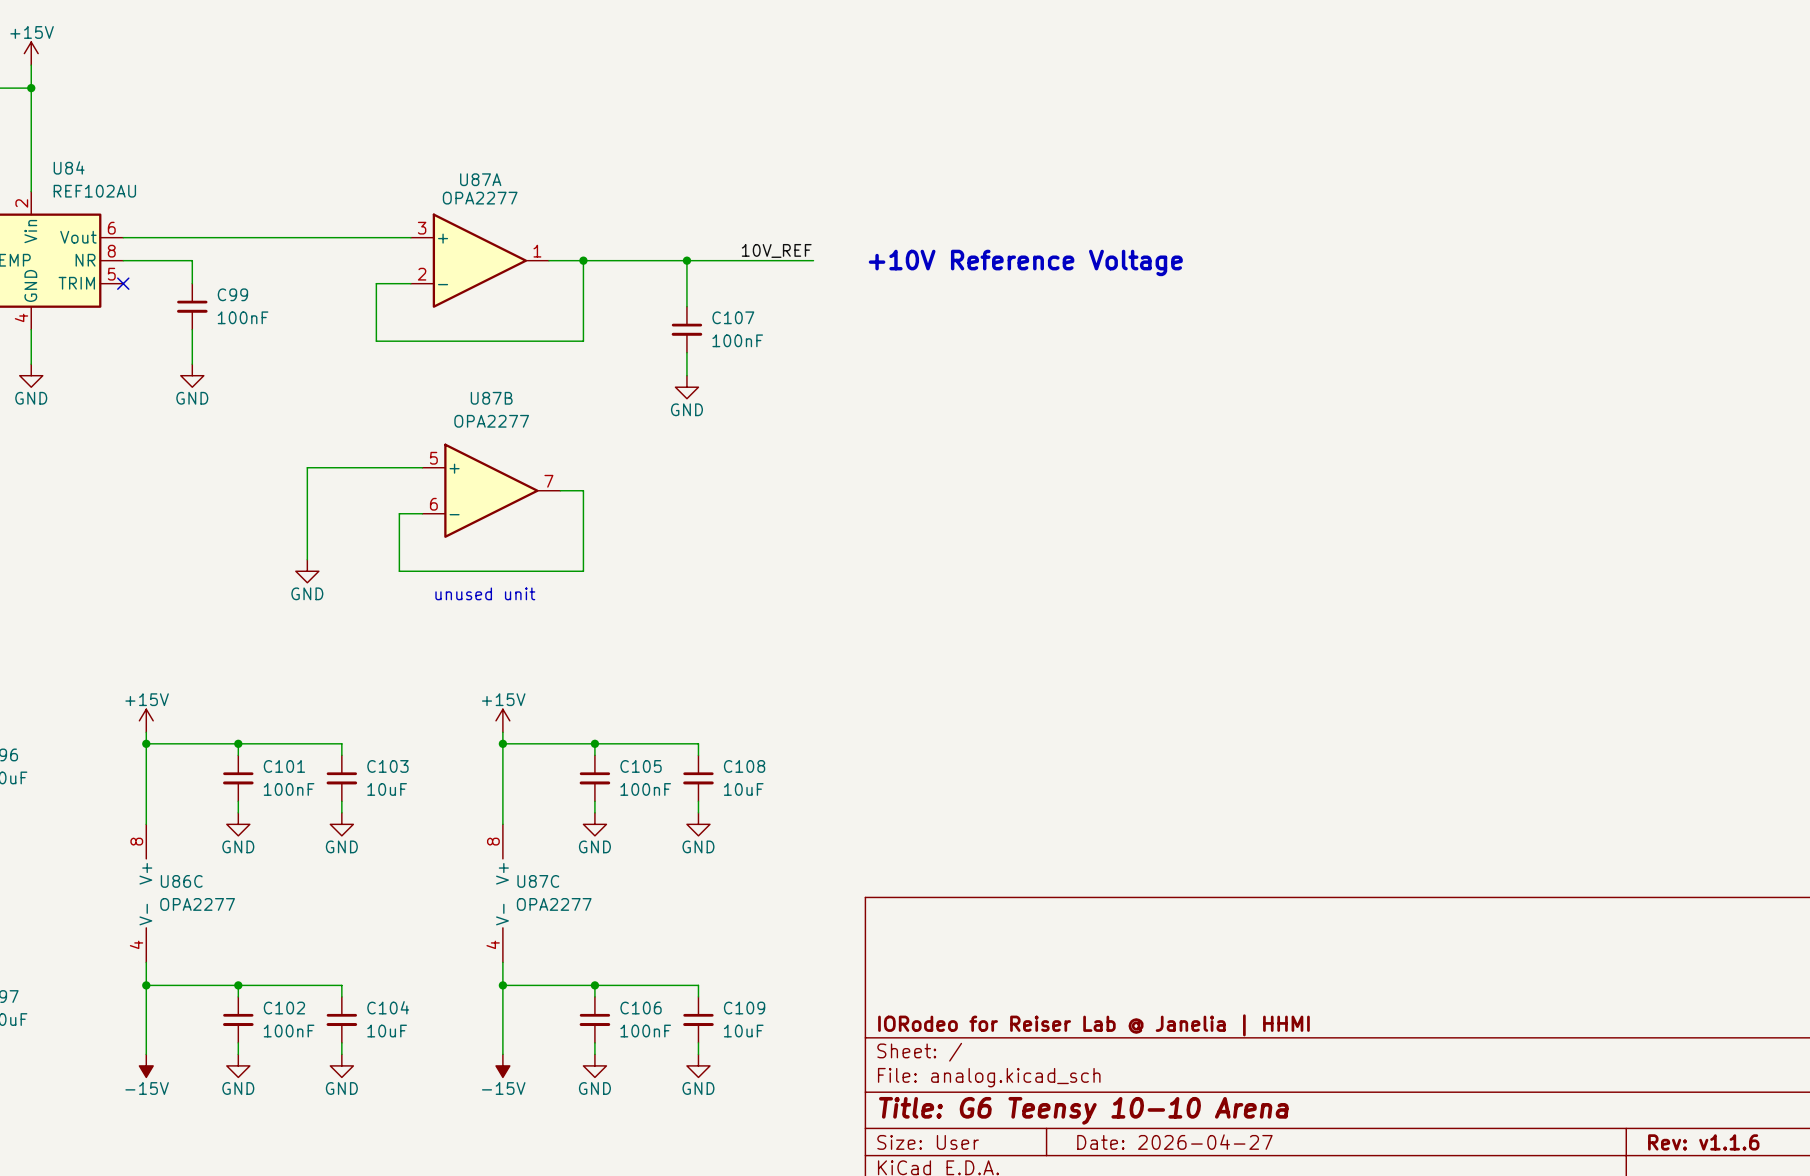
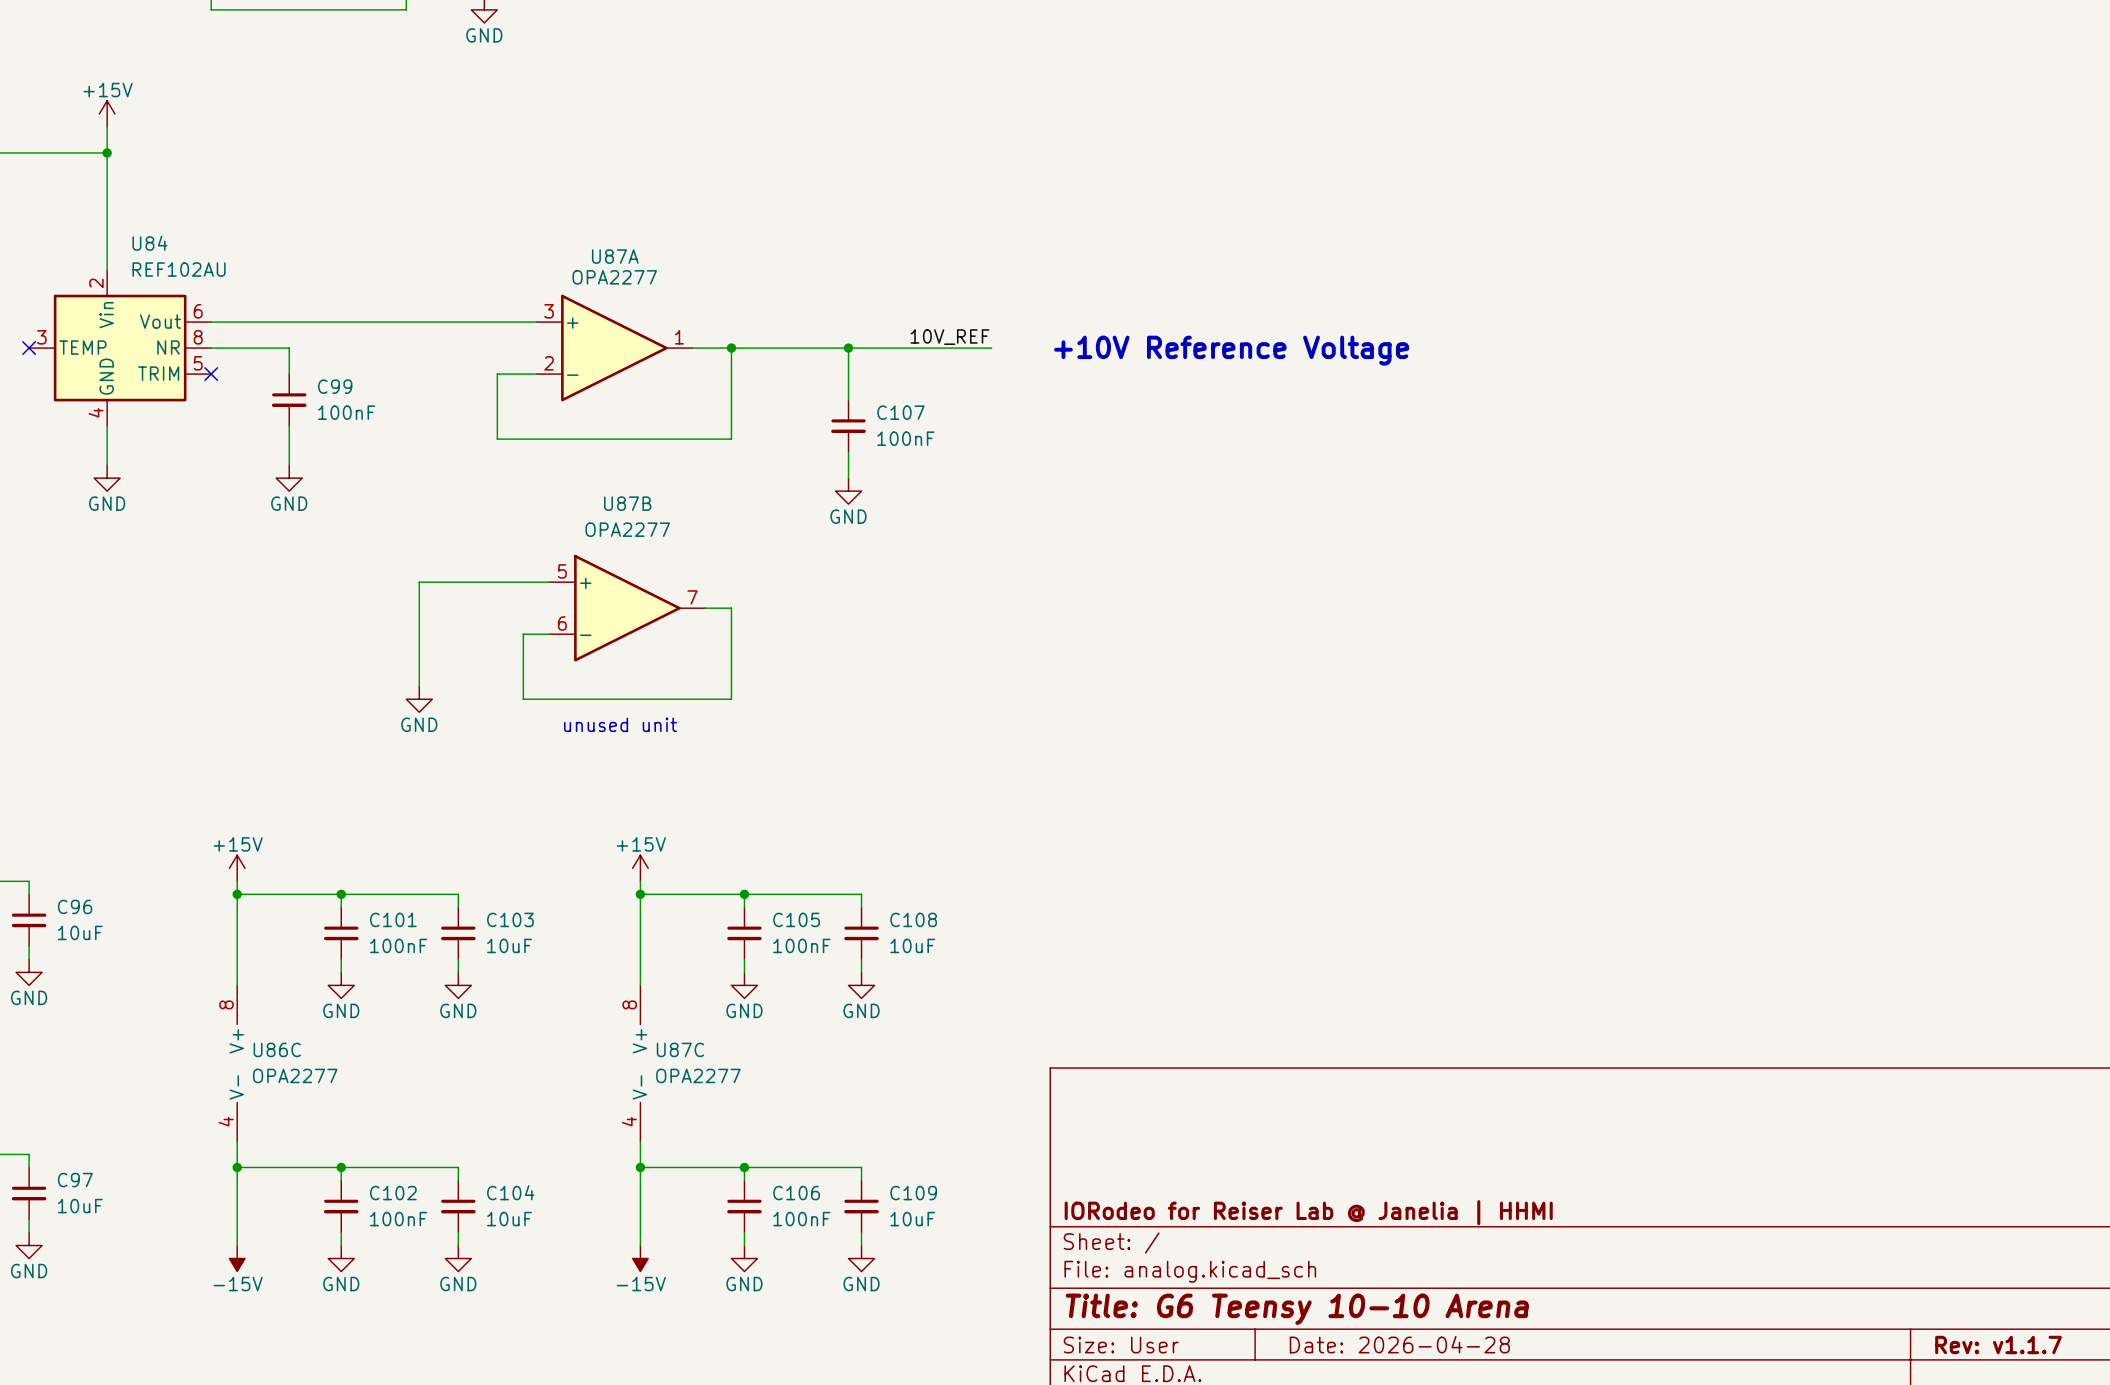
title block: Date: 2026-04-27 (1174, 1142) -> Date: 2026-04-28 (1399, 1344)
title block: Rev: v1.1.6 (1703, 1142) -> Rev: v1.1.7 (1998, 1345)

